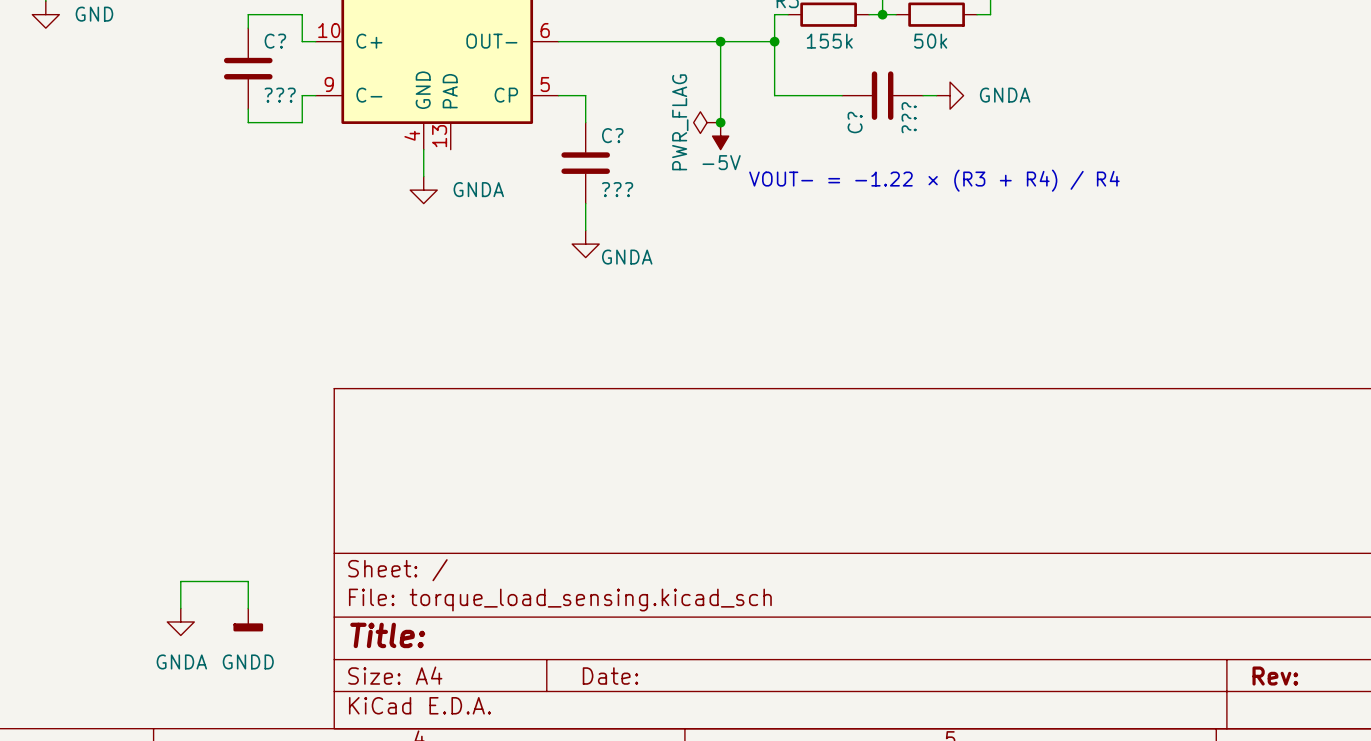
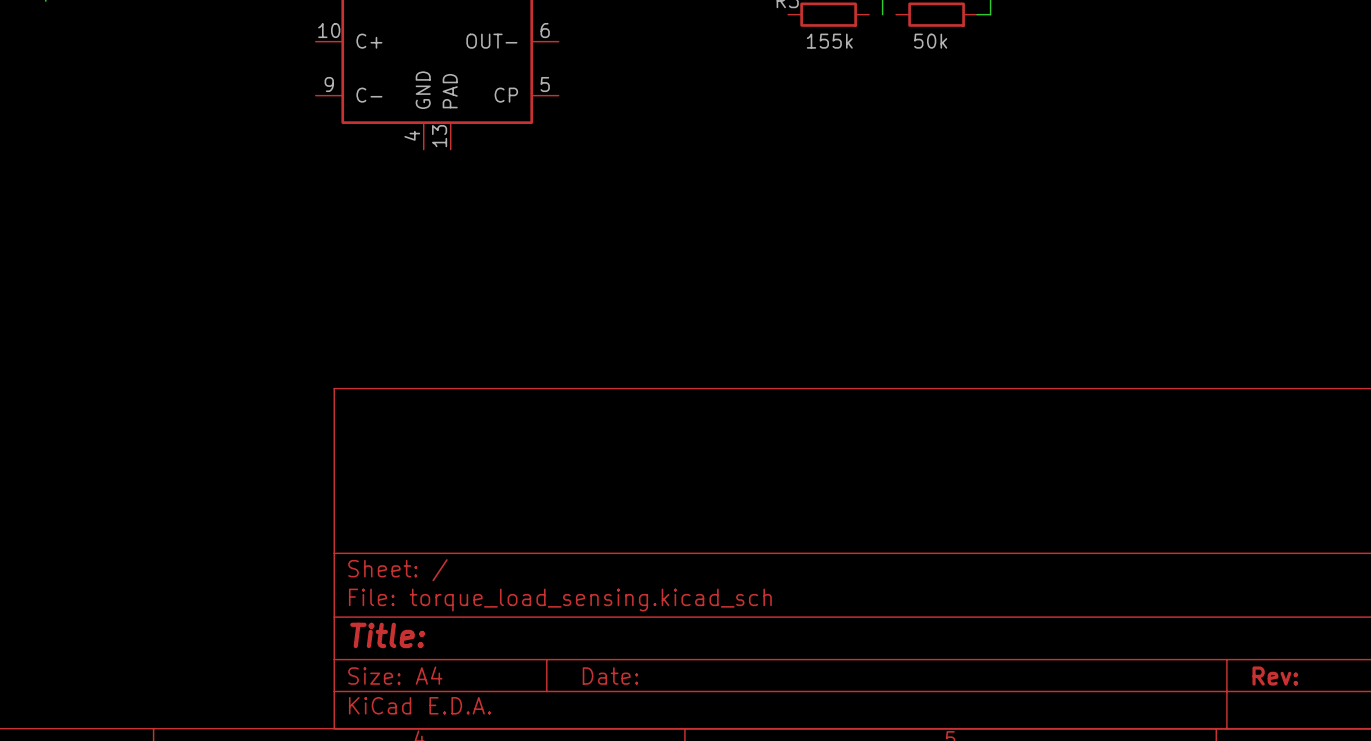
power symbol: GND (45, 14) -> none
wire: (788, 14) (774, 14) (774, 95) (842, 95) -> none
wire: (869, 14) (896, 14) -> none
junction: (882, 14) -> none
wire: (248, 28) (248, 14) (302, 14) (302, 41) (315, 41) -> none
wire: (558, 41) (774, 41) -> none
wire: (720, 41) (720, 122) -> none
junction: (720, 41) -> none
junction: (774, 41) -> none
C?: ??? (248, 68) -> none
wire: (315, 95) (302, 95) (302, 122) (248, 122) (248, 109) -> none
wire: (558, 95) (585, 95) (585, 122) -> none
C?: ??? (882, 95) -> none
wire: (923, 95) (936, 95) -> none
power symbol: GNDA (950, 95) -> none
power symbol: PWR_FLAG (707, 122) -> none
junction: (720, 122) -> none
power symbol: -5V (720, 136) -> none
wire: (423, 149) (423, 176) -> none
C?: ??? (585, 163) -> none
text: VOUT- = -1.22 × (R3 + R4) / R4 (934, 180) -> none
power symbol: GNDA (423, 190) -> none
wire: (585, 203) (585, 230) -> none
power symbol: GNDA (585, 244) -> none
wire: (180, 608) (180, 581) (248, 581) (248, 608) -> none
power symbol: GNDD (248, 619) -> none
power symbol: GNDA (180, 621) -> none

